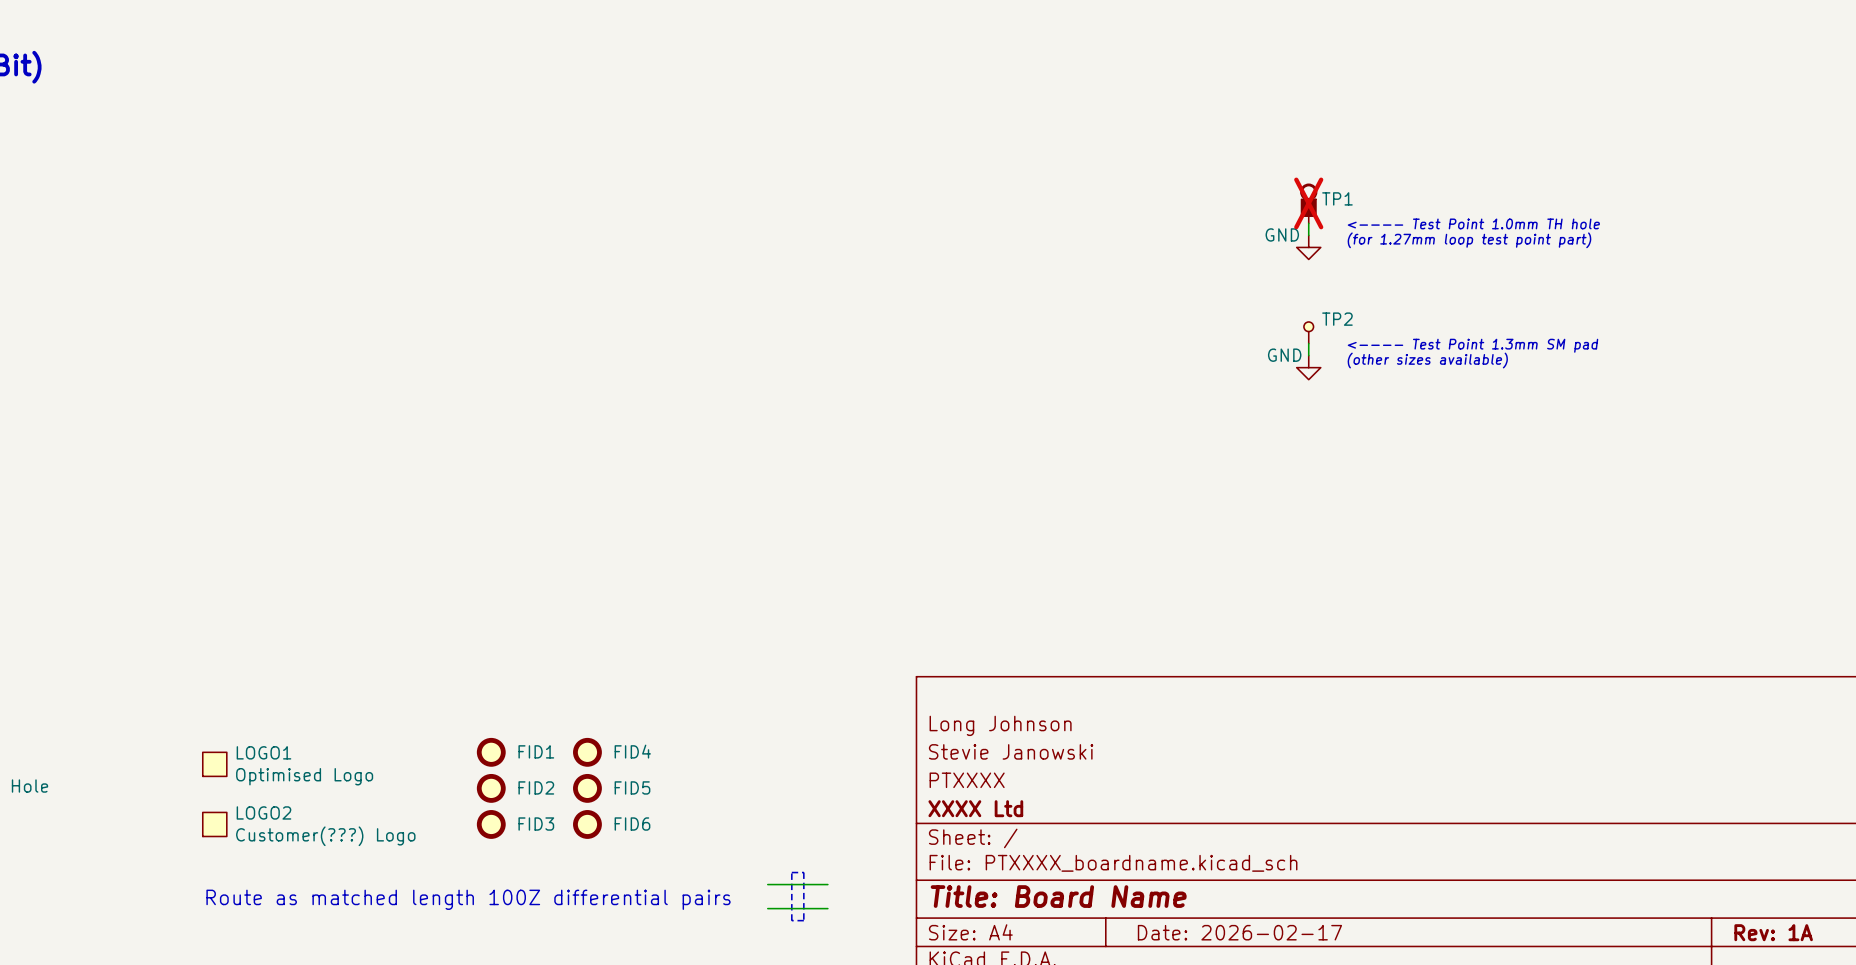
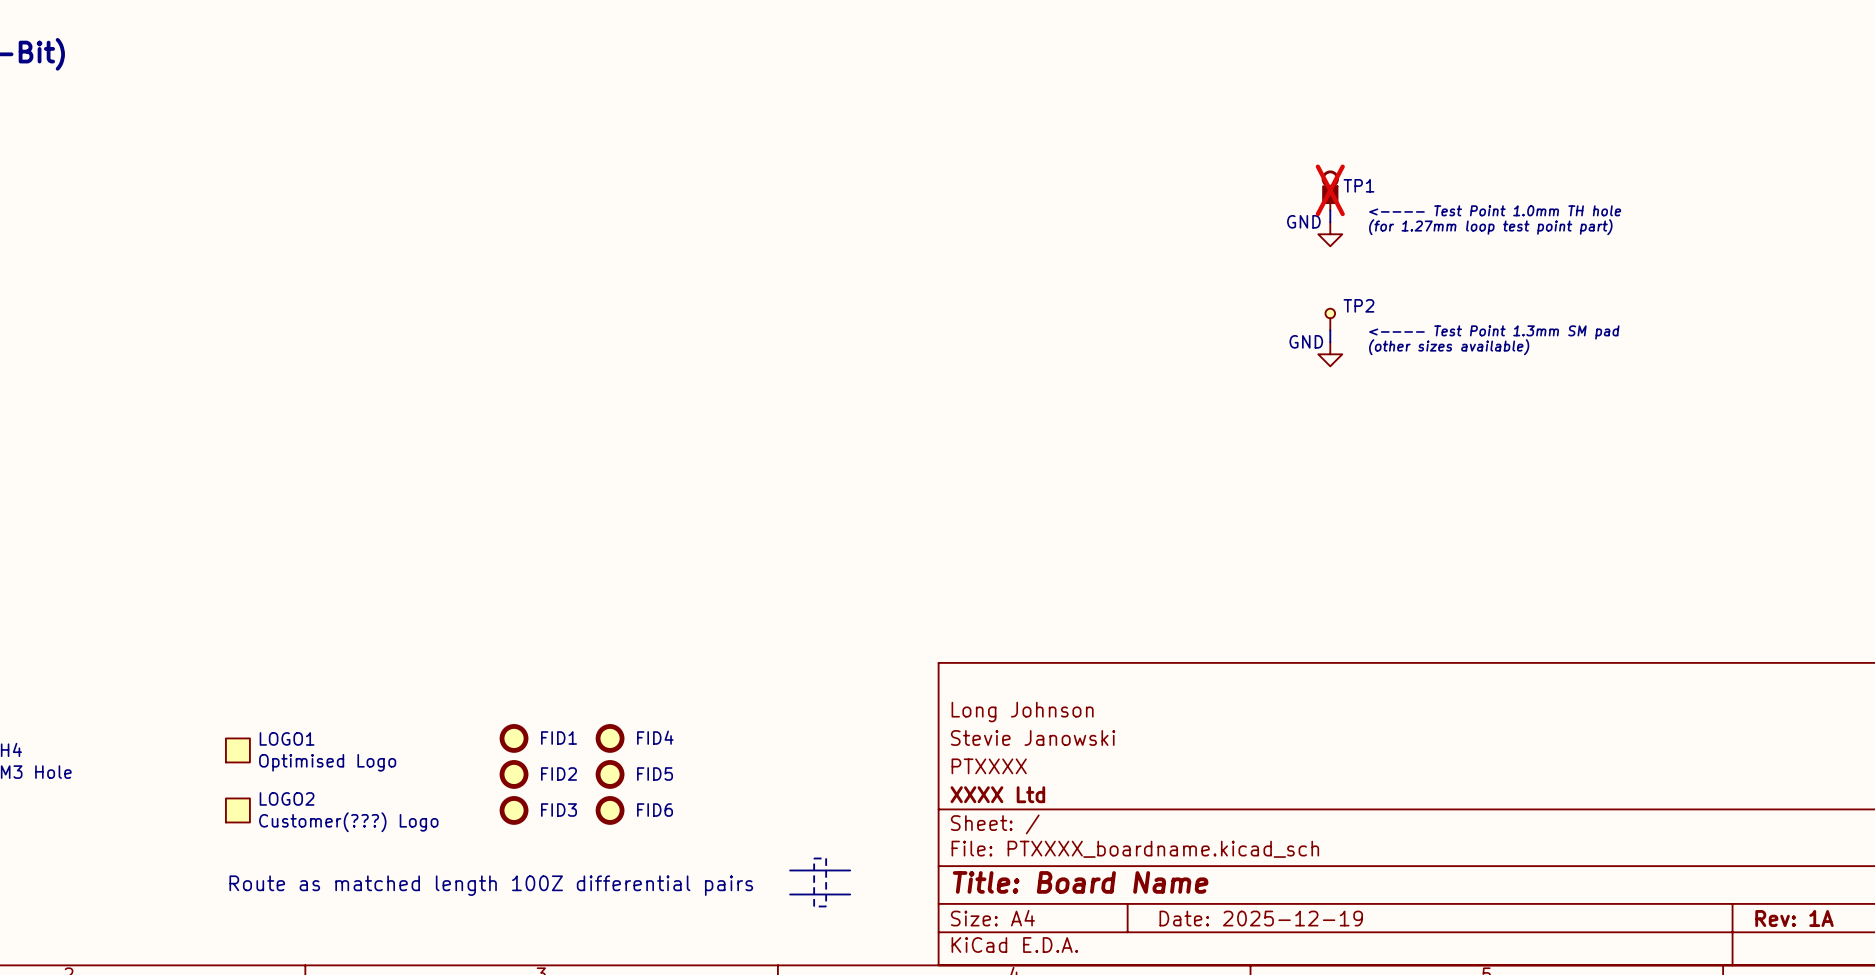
title block: Date: 2026-02-17 (1239, 932) -> Date: 2025-12-19 (1261, 918)

